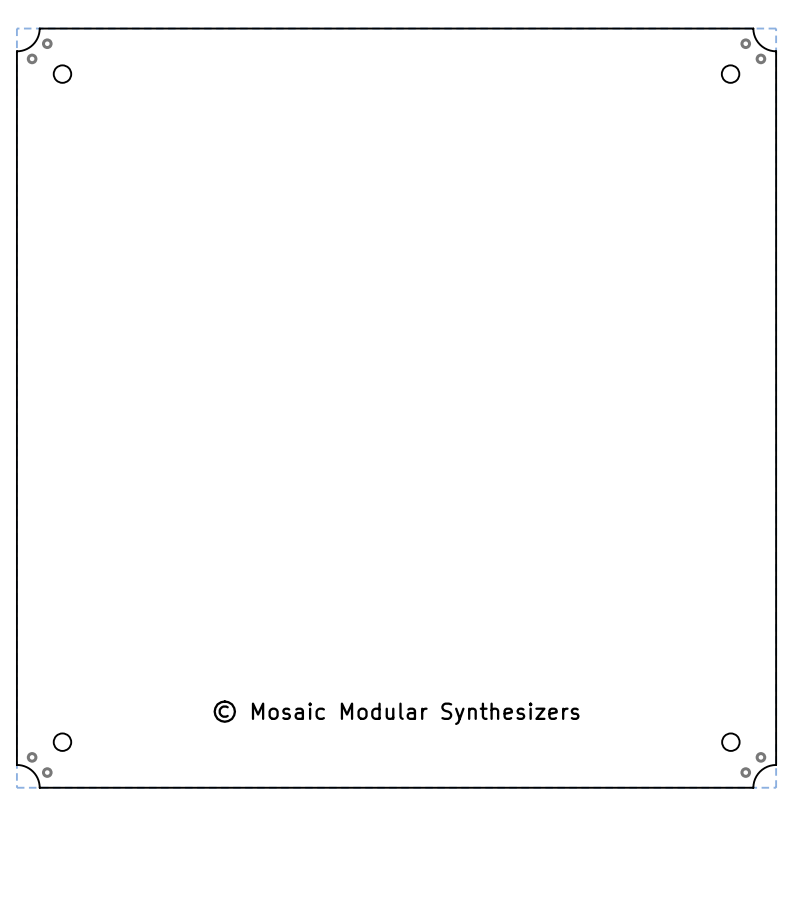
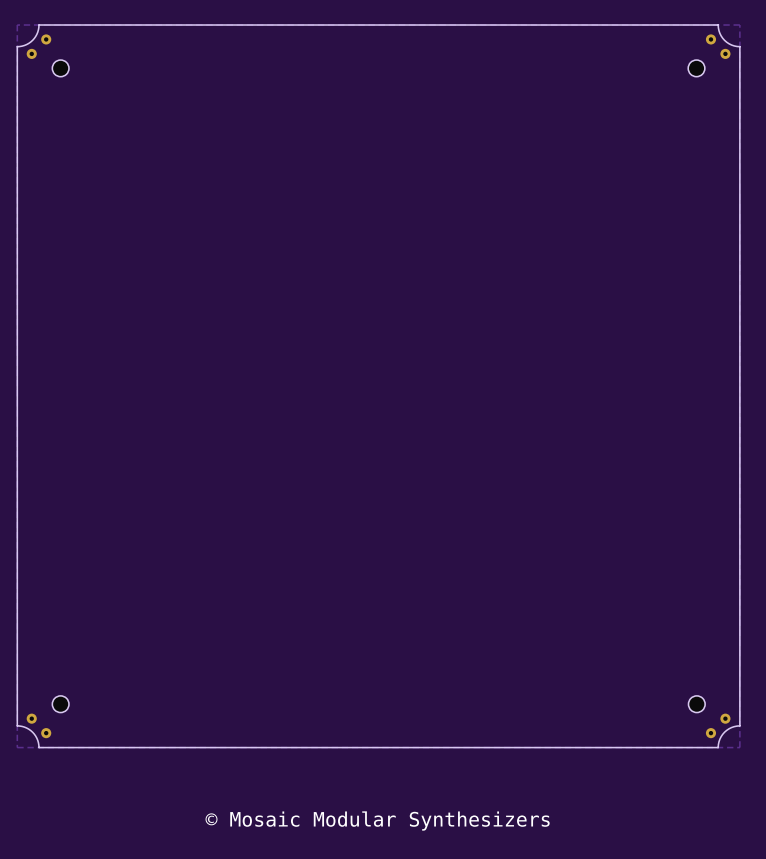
drawing position: (396, 712) -> (377, 821)

